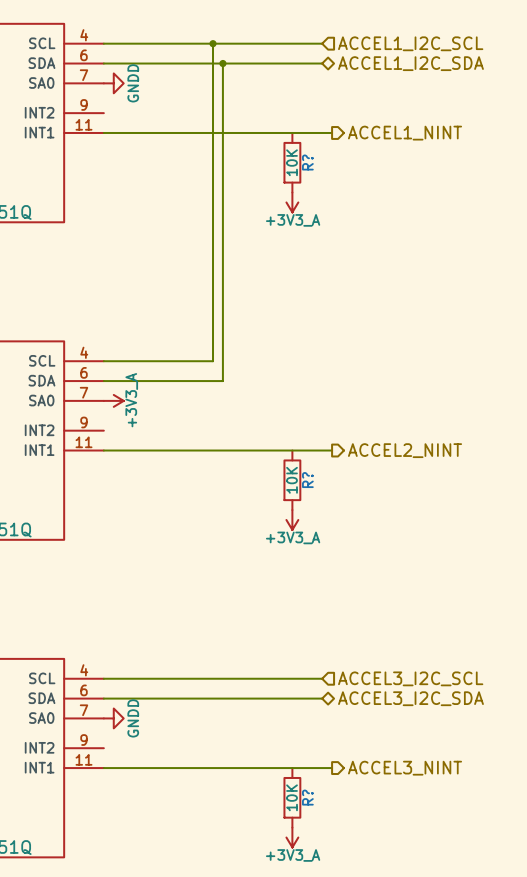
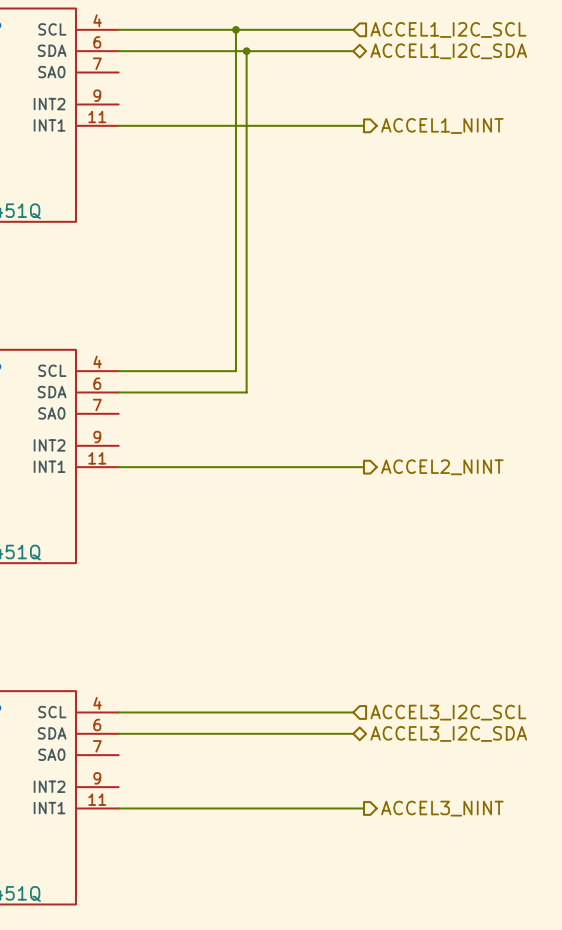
power symbol: GNDD (113, 83) -> none
R?: 10K (292, 162) -> none
power symbol: +3V3_A (292, 202) -> none
power symbol: +3V3_A (113, 400) -> none
R?: 10K (292, 480) -> none
power symbol: +3V3_A (292, 519) -> none
power symbol: GNDD (113, 718) -> none
R?: 10K (292, 797) -> none
power symbol: +3V3_A (292, 837) -> none

